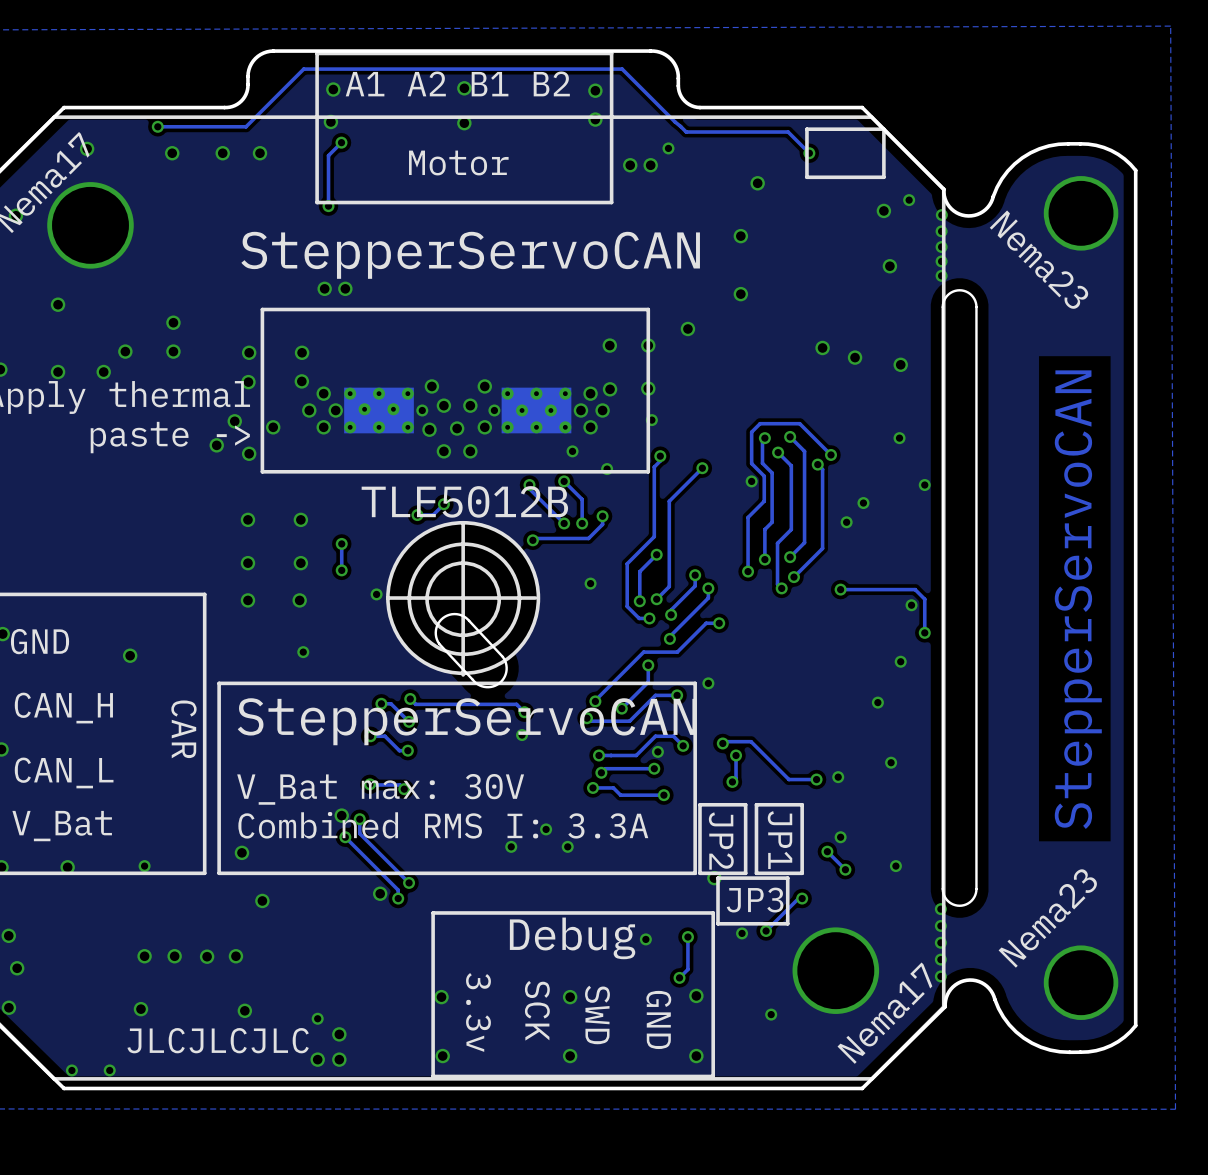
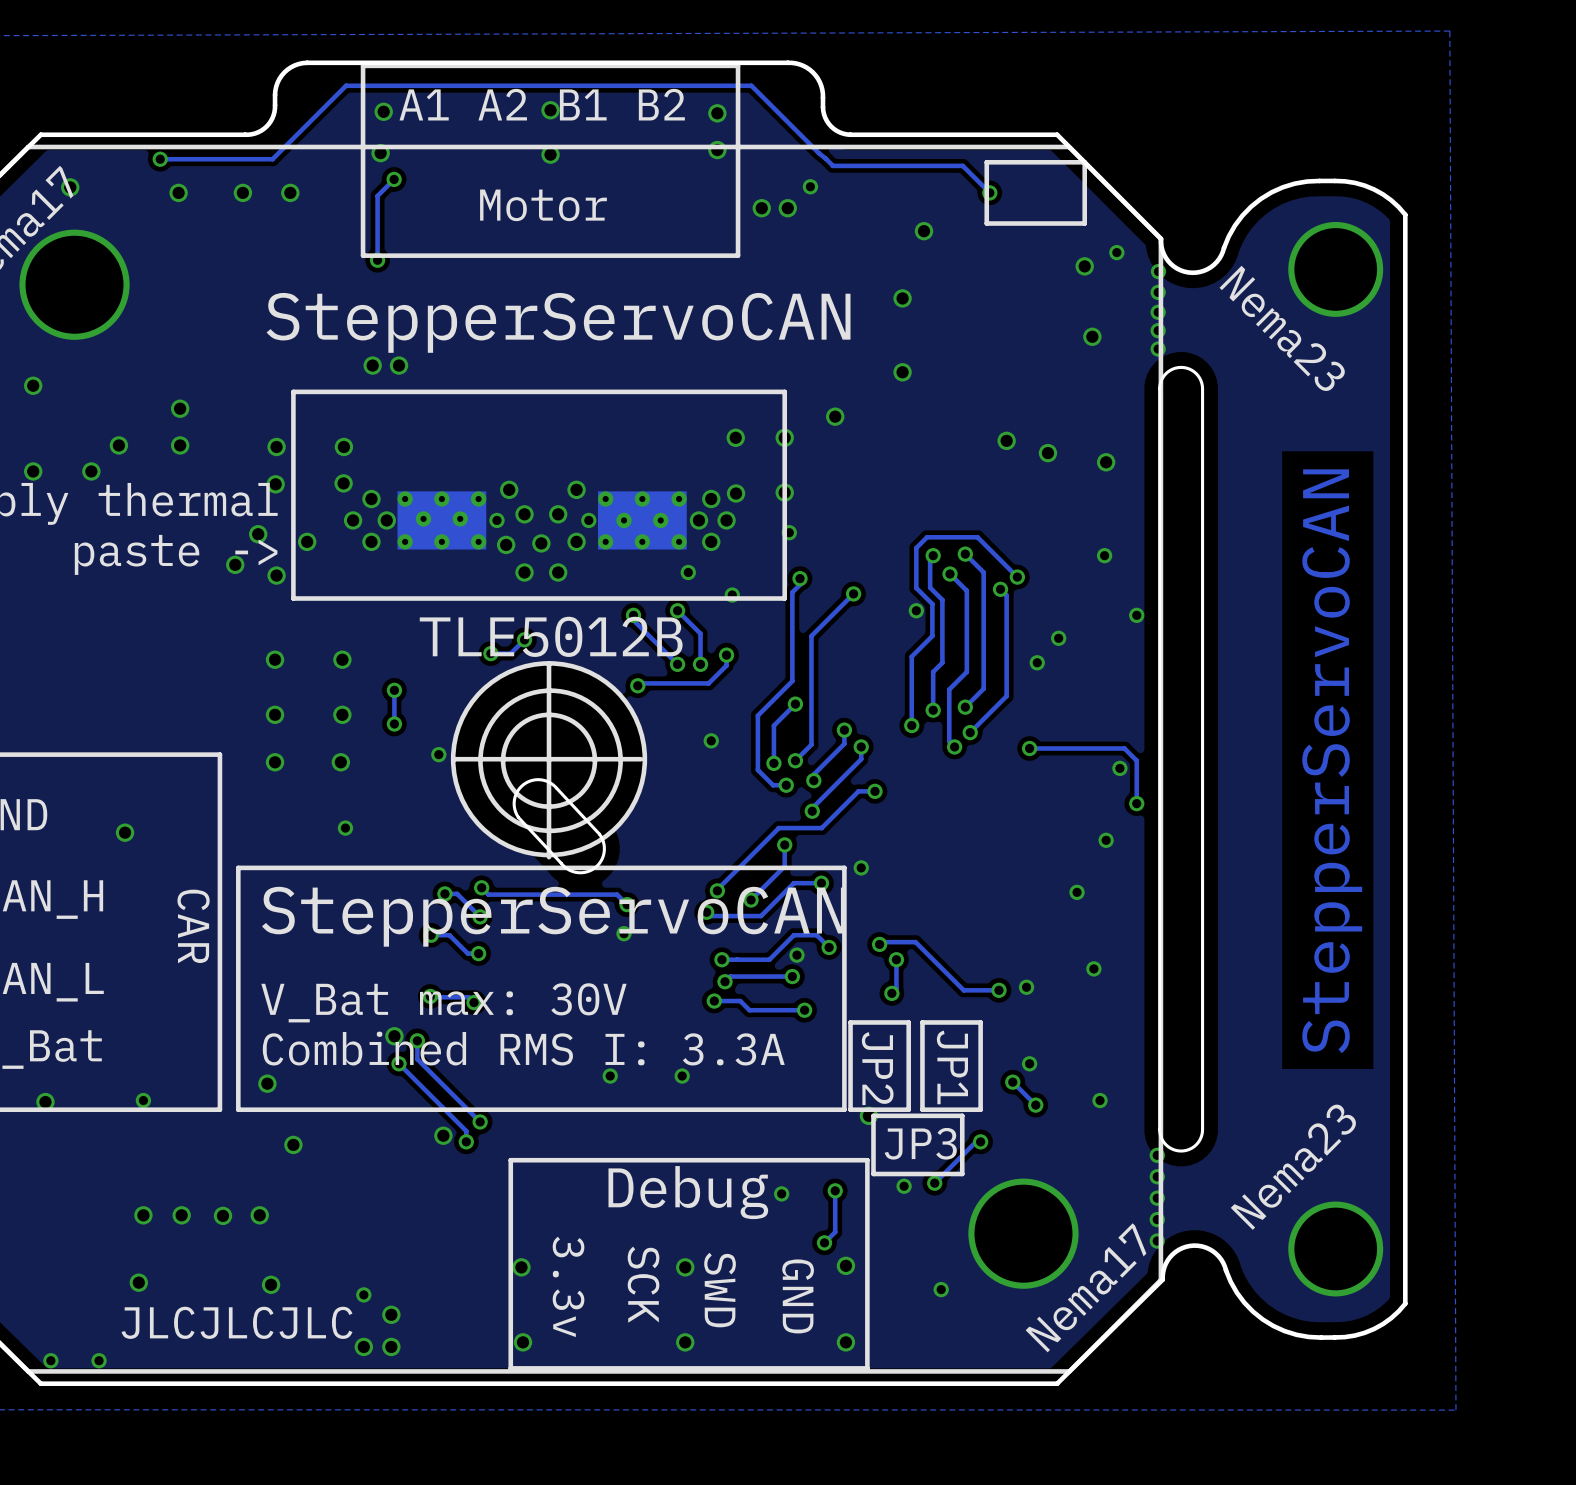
via: (546, 829) -> none

